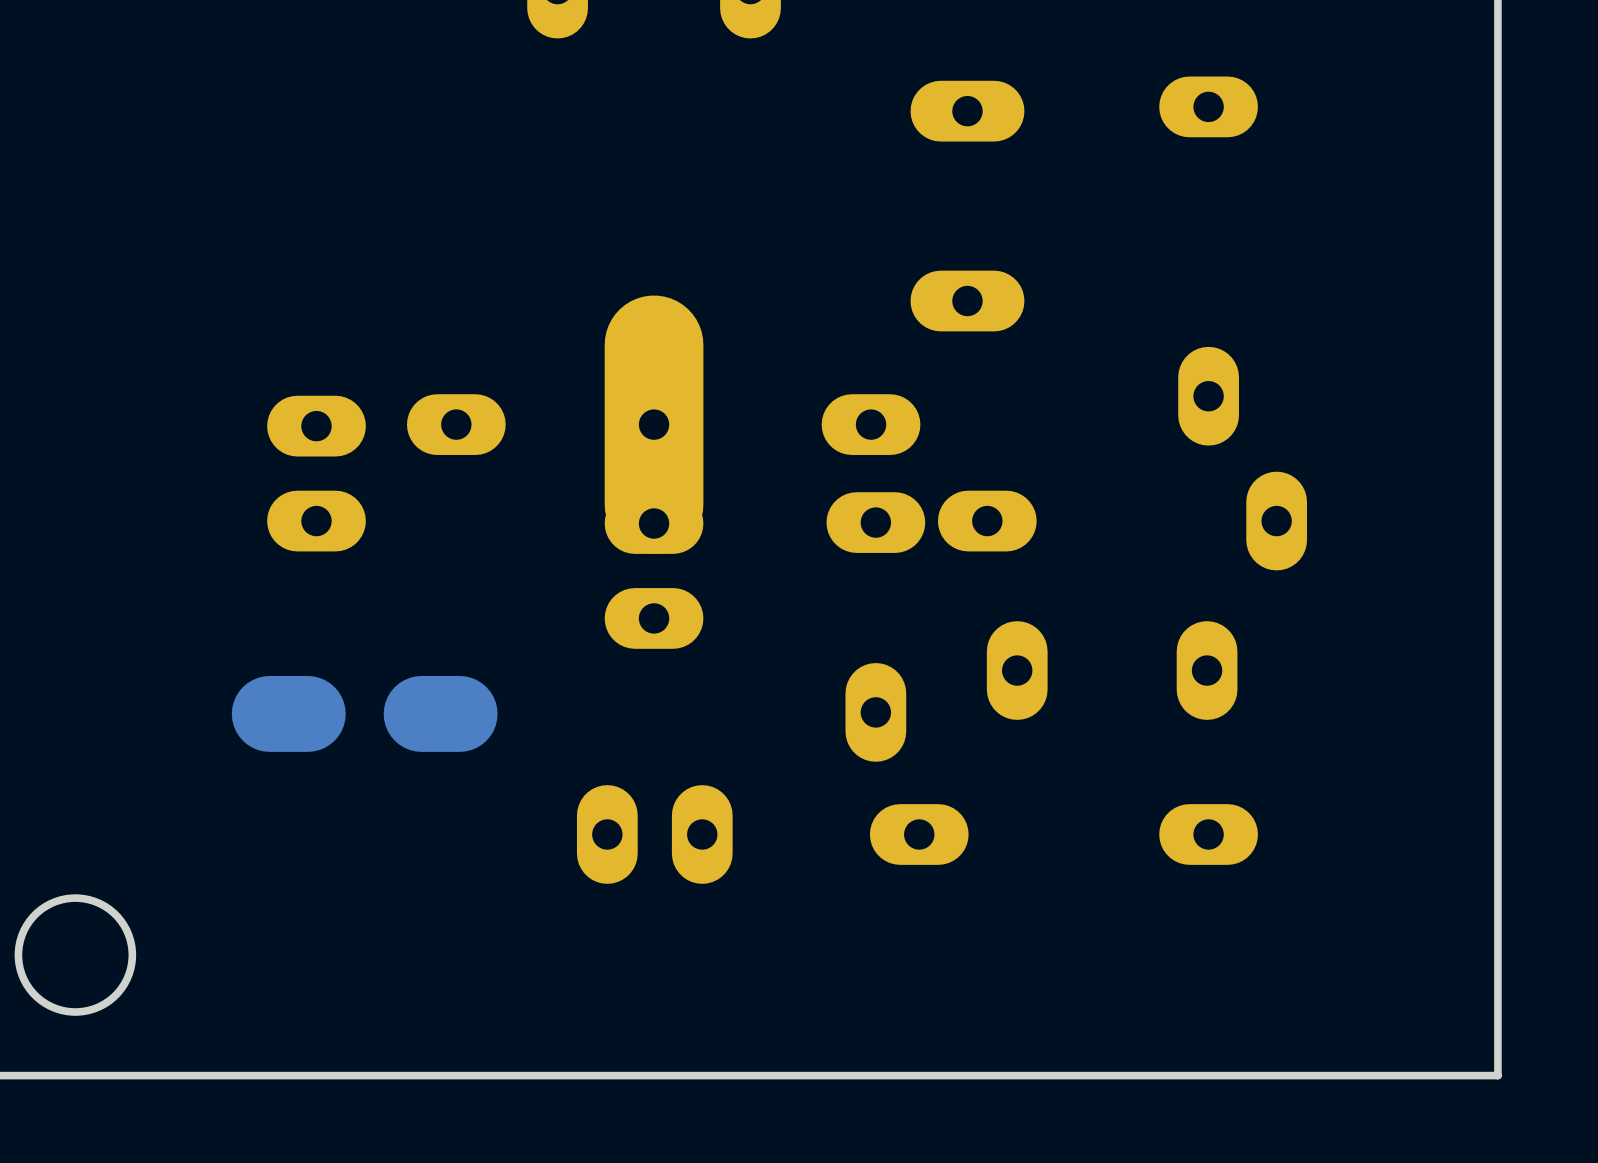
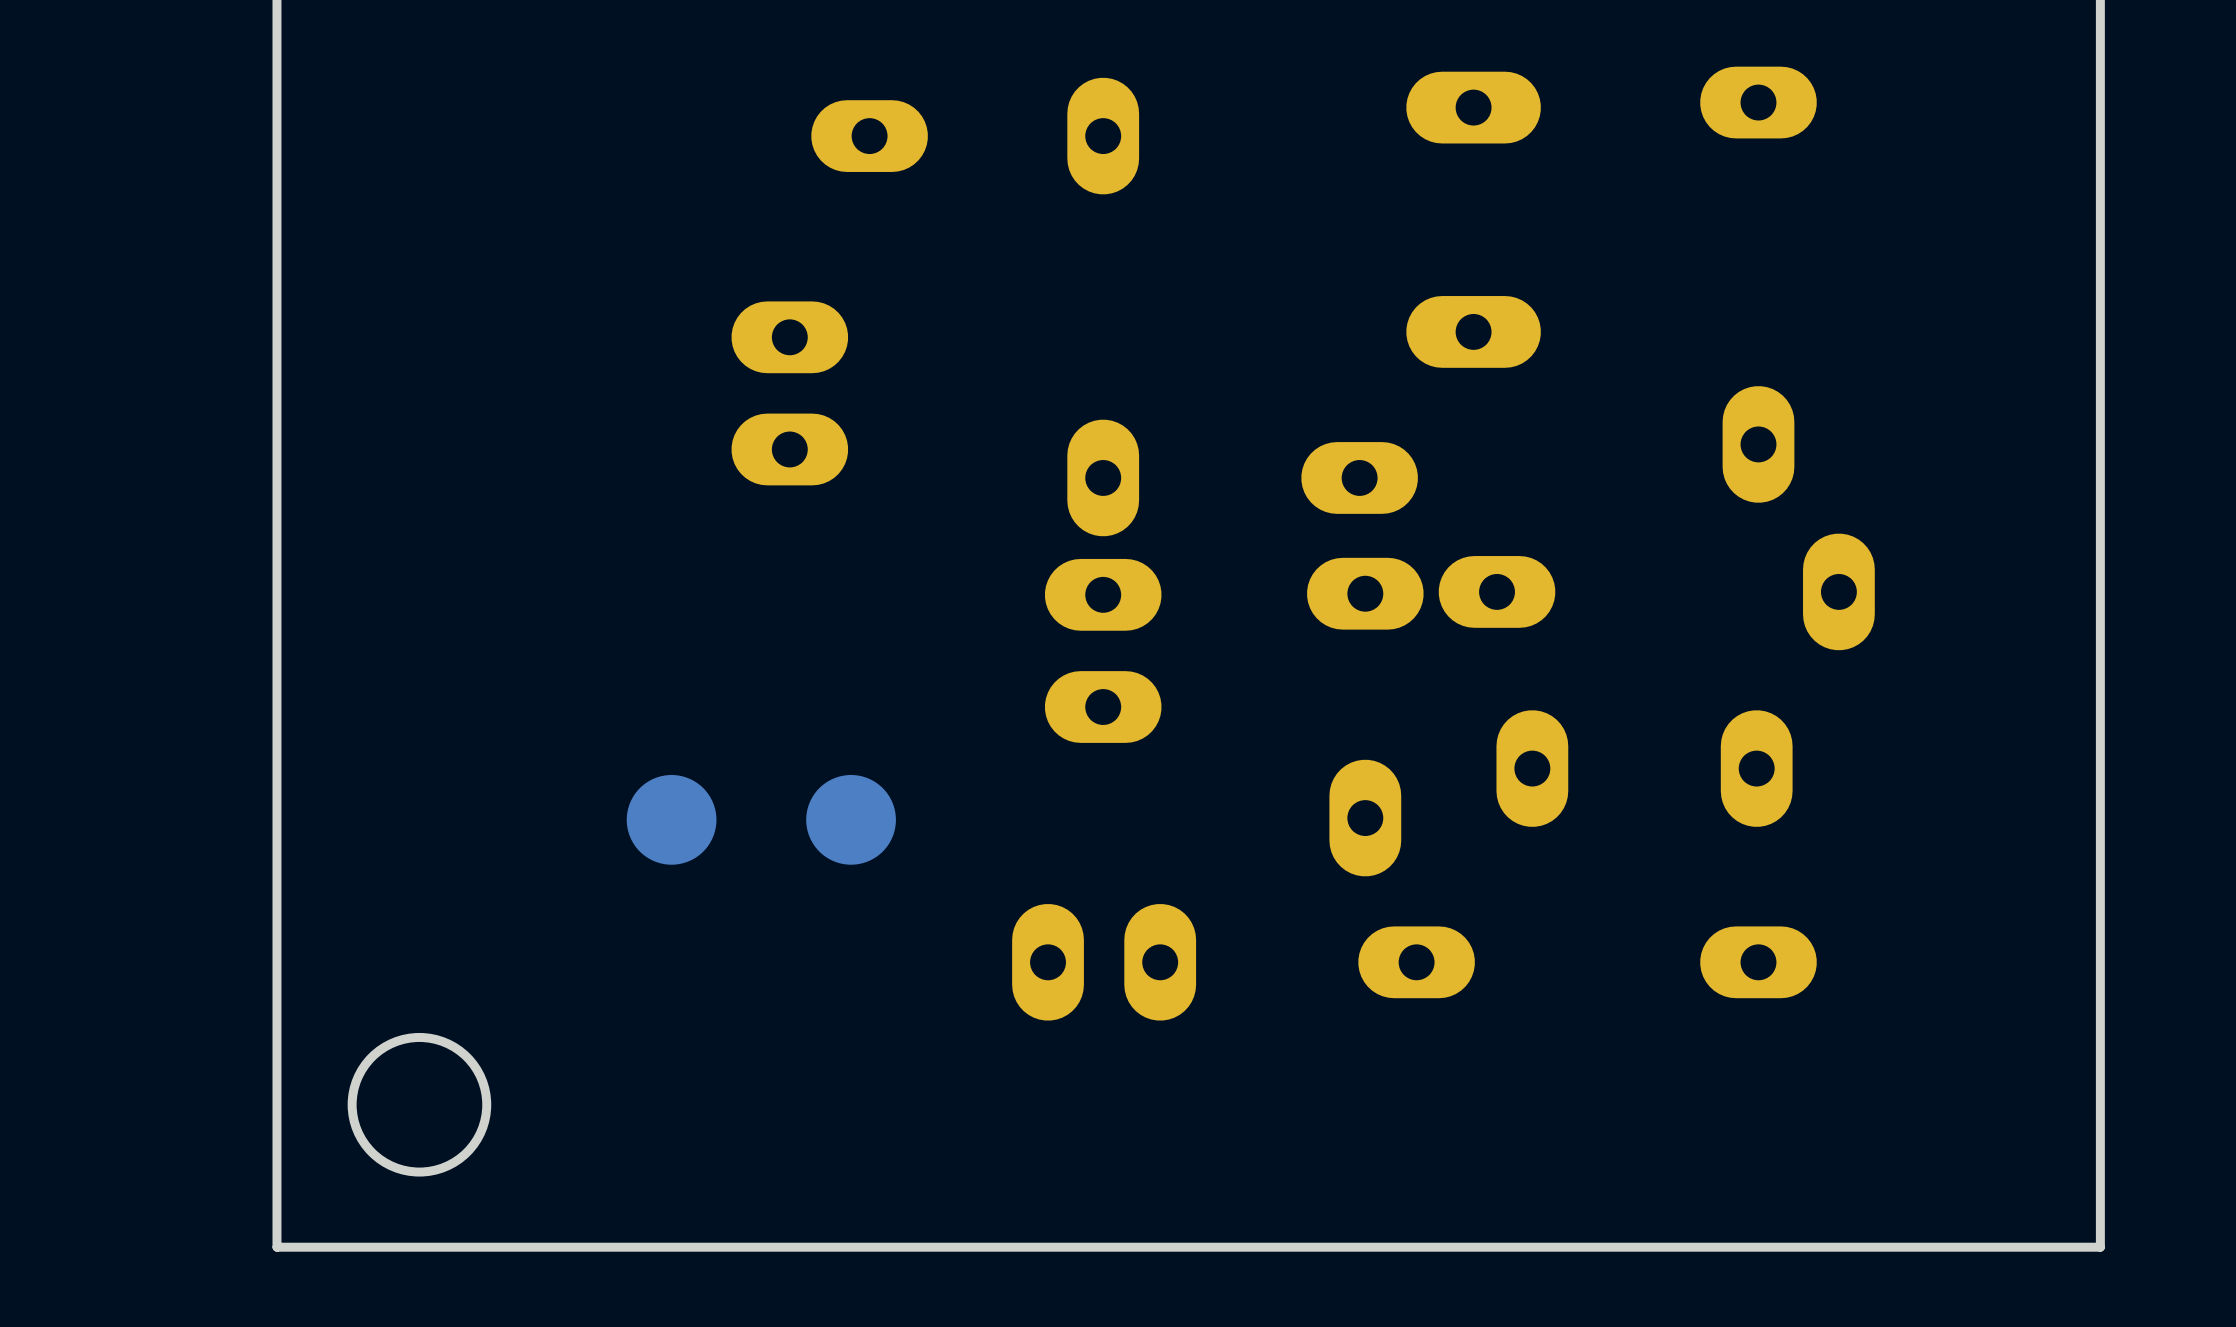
part: none -> (869, 136)
part: none -> (1103, 136)
part footprint: [604, 295, 704, 554] -> [1067, 419, 1140, 537]
part: (456, 424) -> none
part position: (316, 473) -> (789, 393)
part footprint: [231, 675, 498, 752] -> [626, 774, 896, 865]

